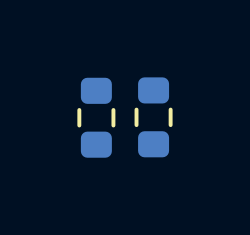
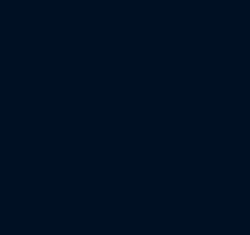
part: (96, 117) -> none
part: (153, 117) -> none

